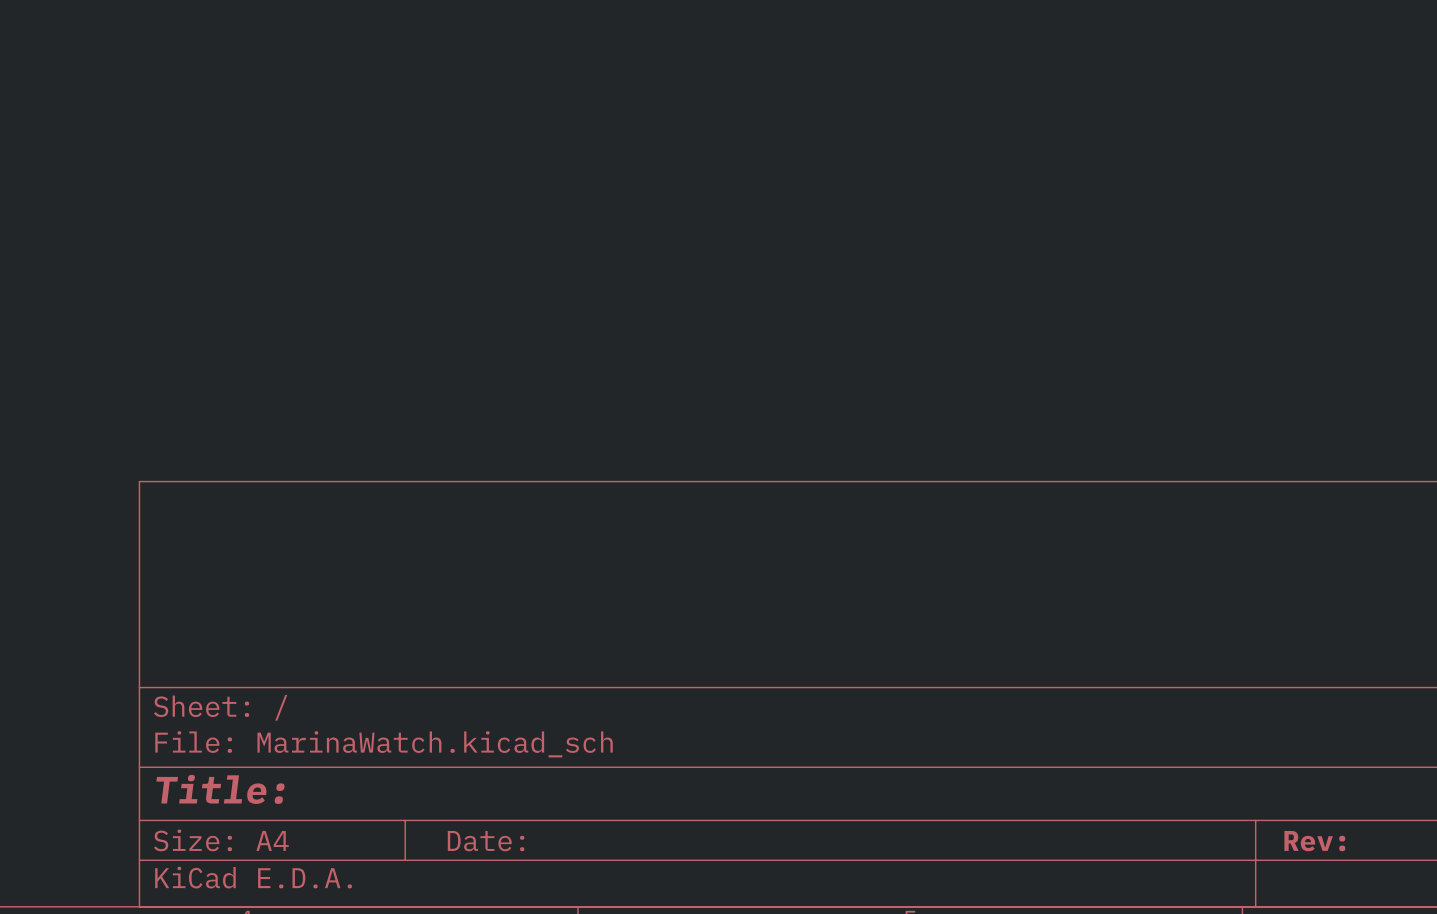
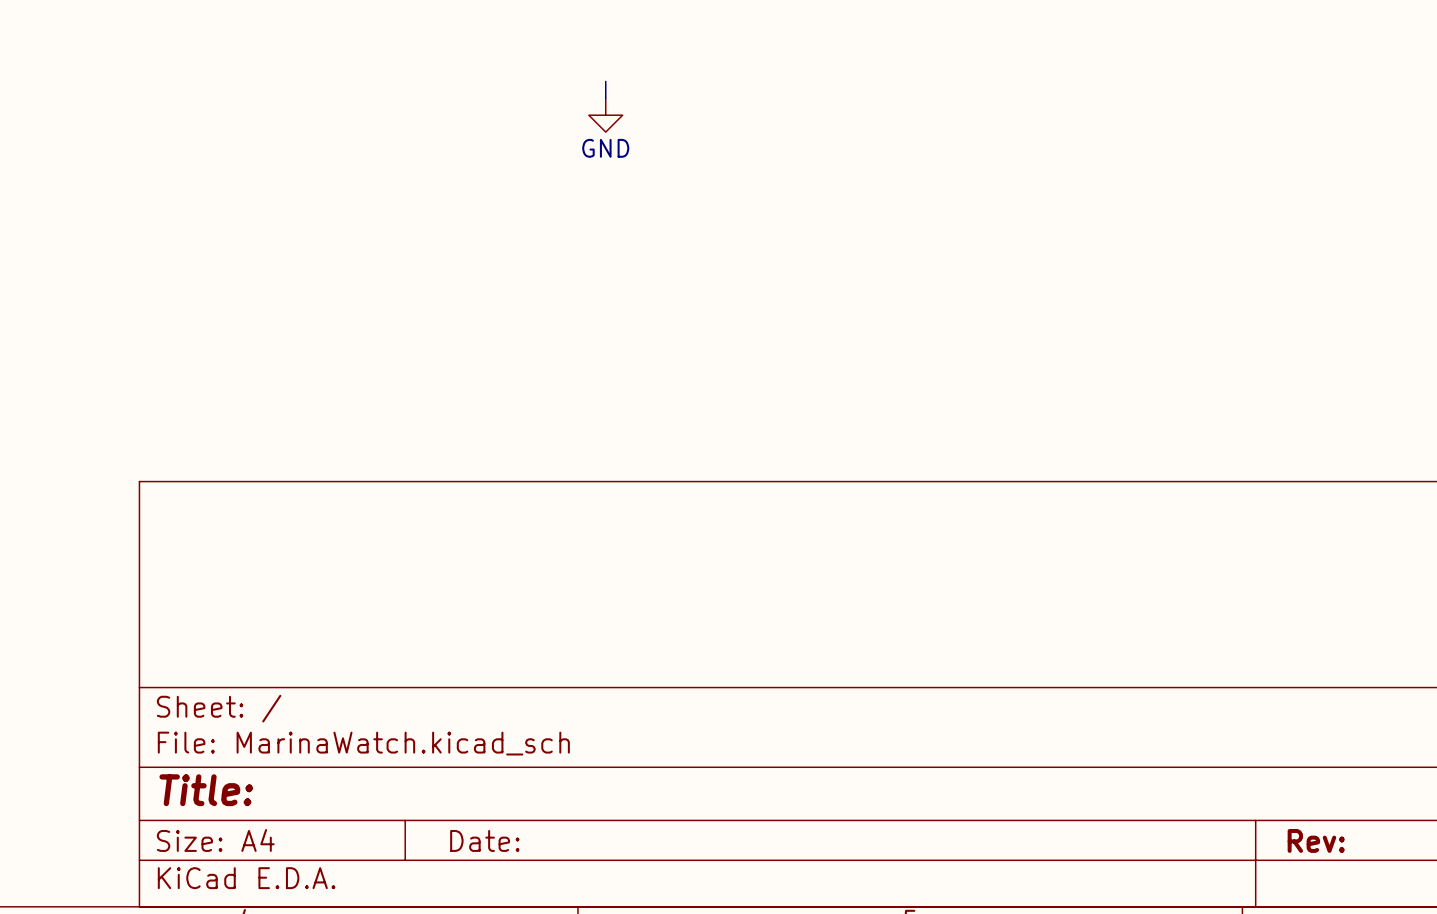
wire: none -> (605, 81) (605, 98)
power symbol: none -> GND (605, 115)

